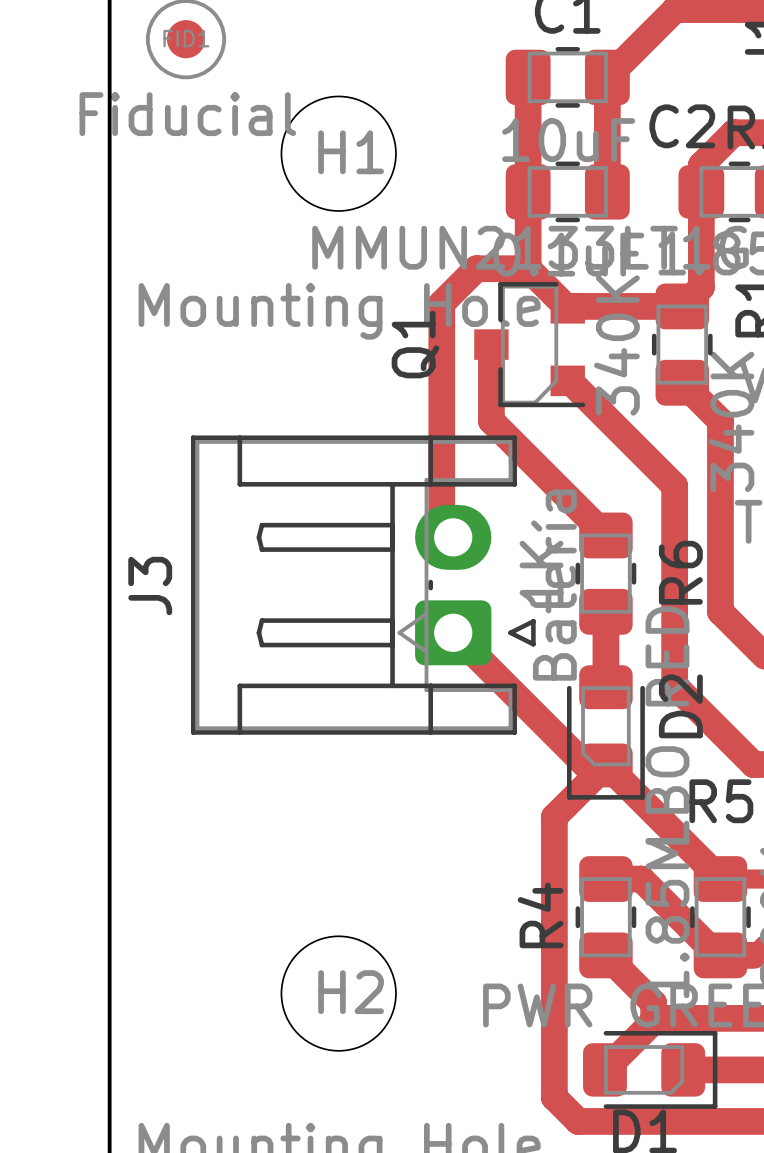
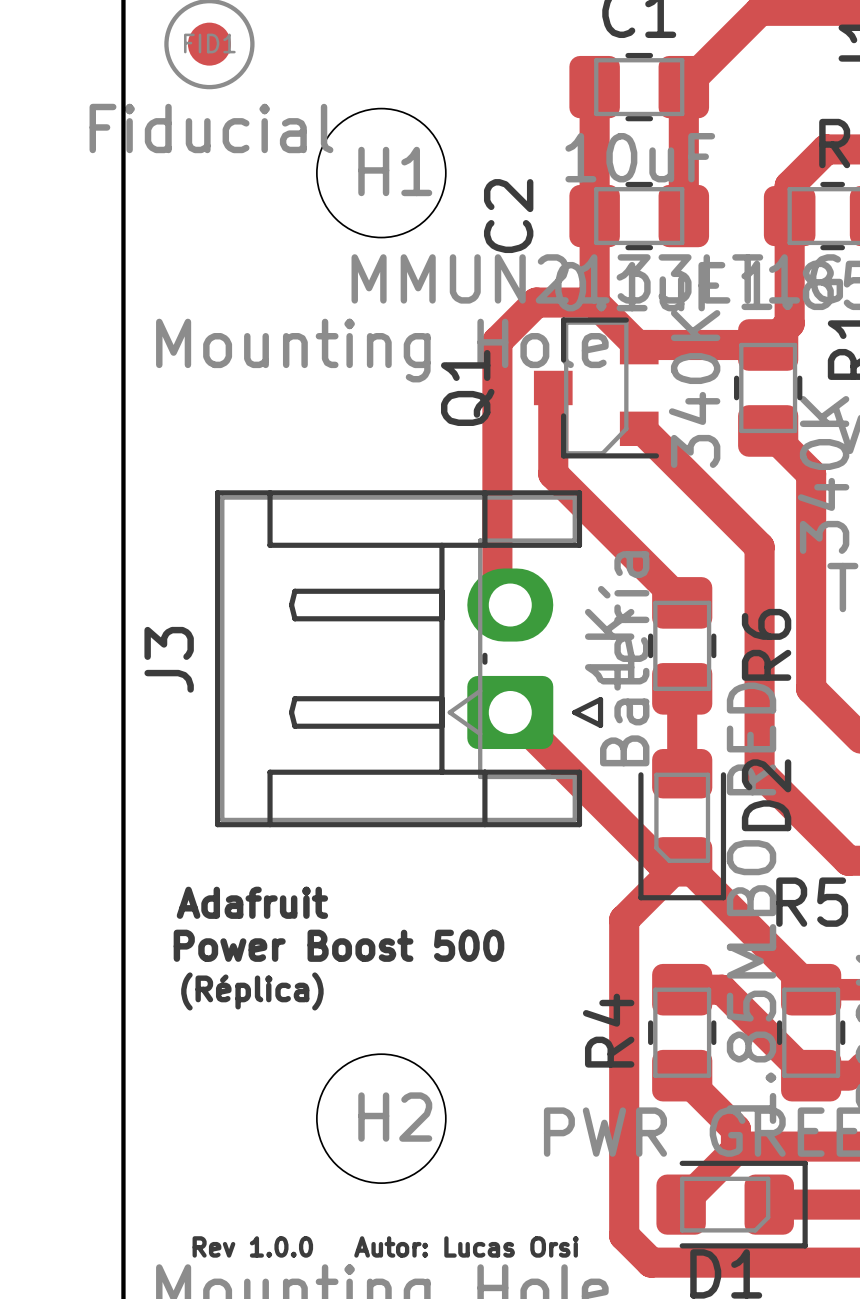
C2 name rotation: 0° (682, 126) -> 90° counterclockwise (508, 216)
C2 name position: C2 (682, 126) -> C2 (508, 216)
text: none -> Adafruit (252, 902)
text: none -> Power Boost 500 (338, 945)
text: none -> (Réplica) (252, 991)
text: none -> Rev 1.0.0 (252, 1246)
text: none -> Autor: Lucas Orsi (466, 1246)

